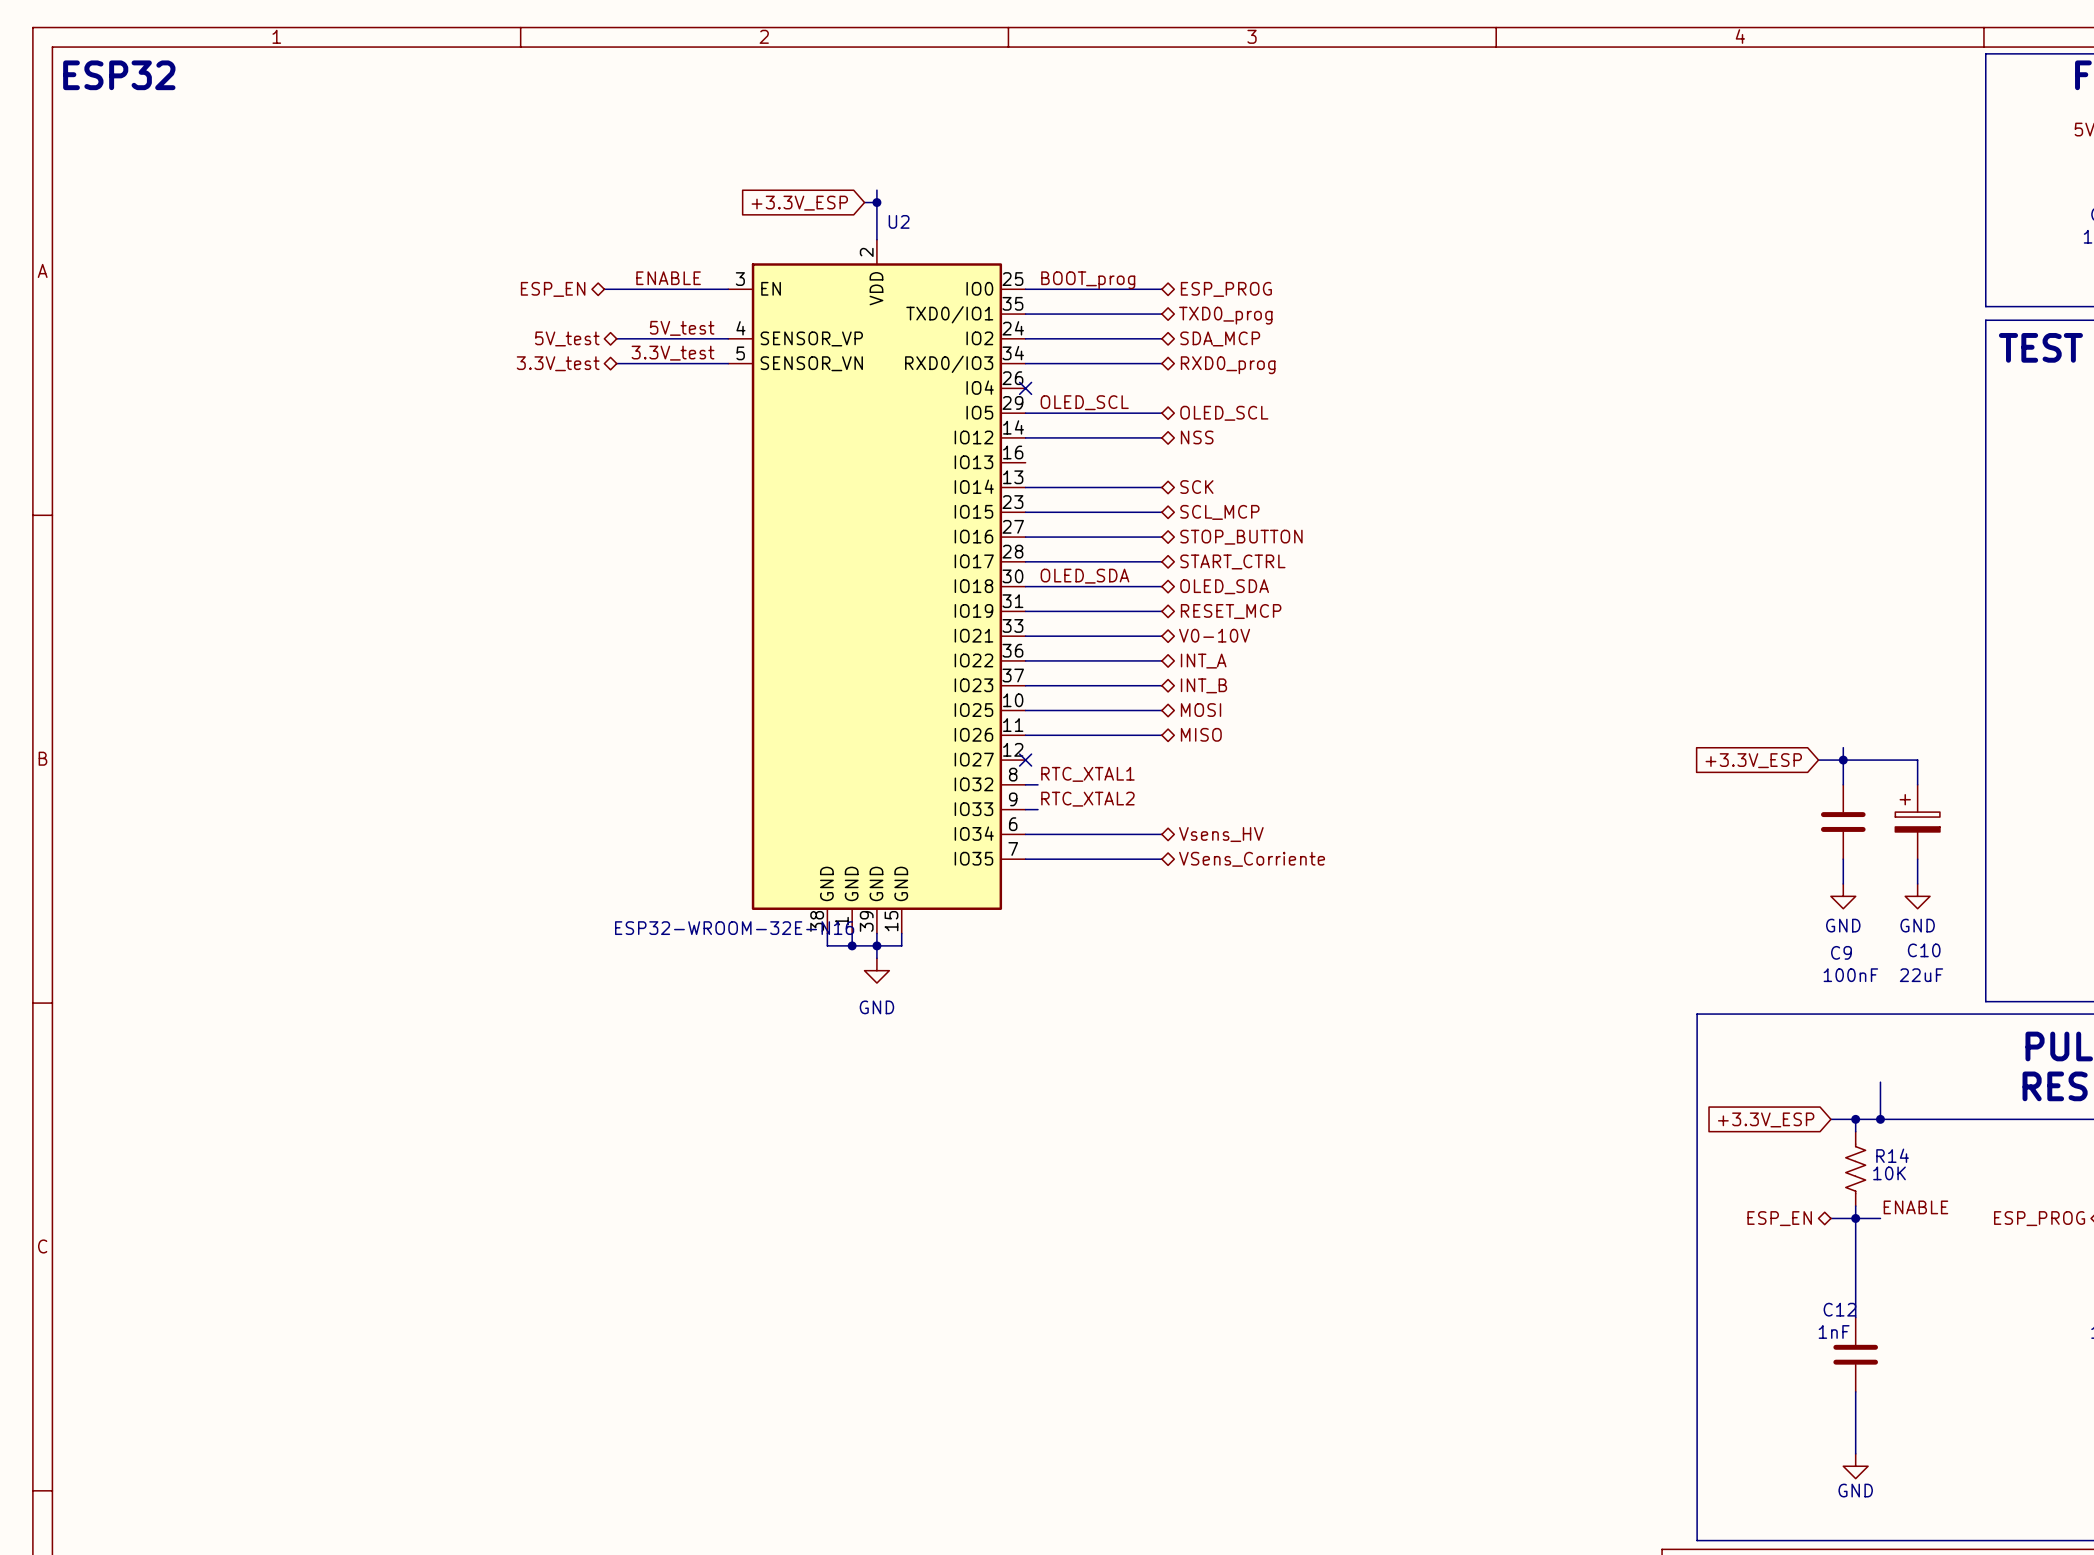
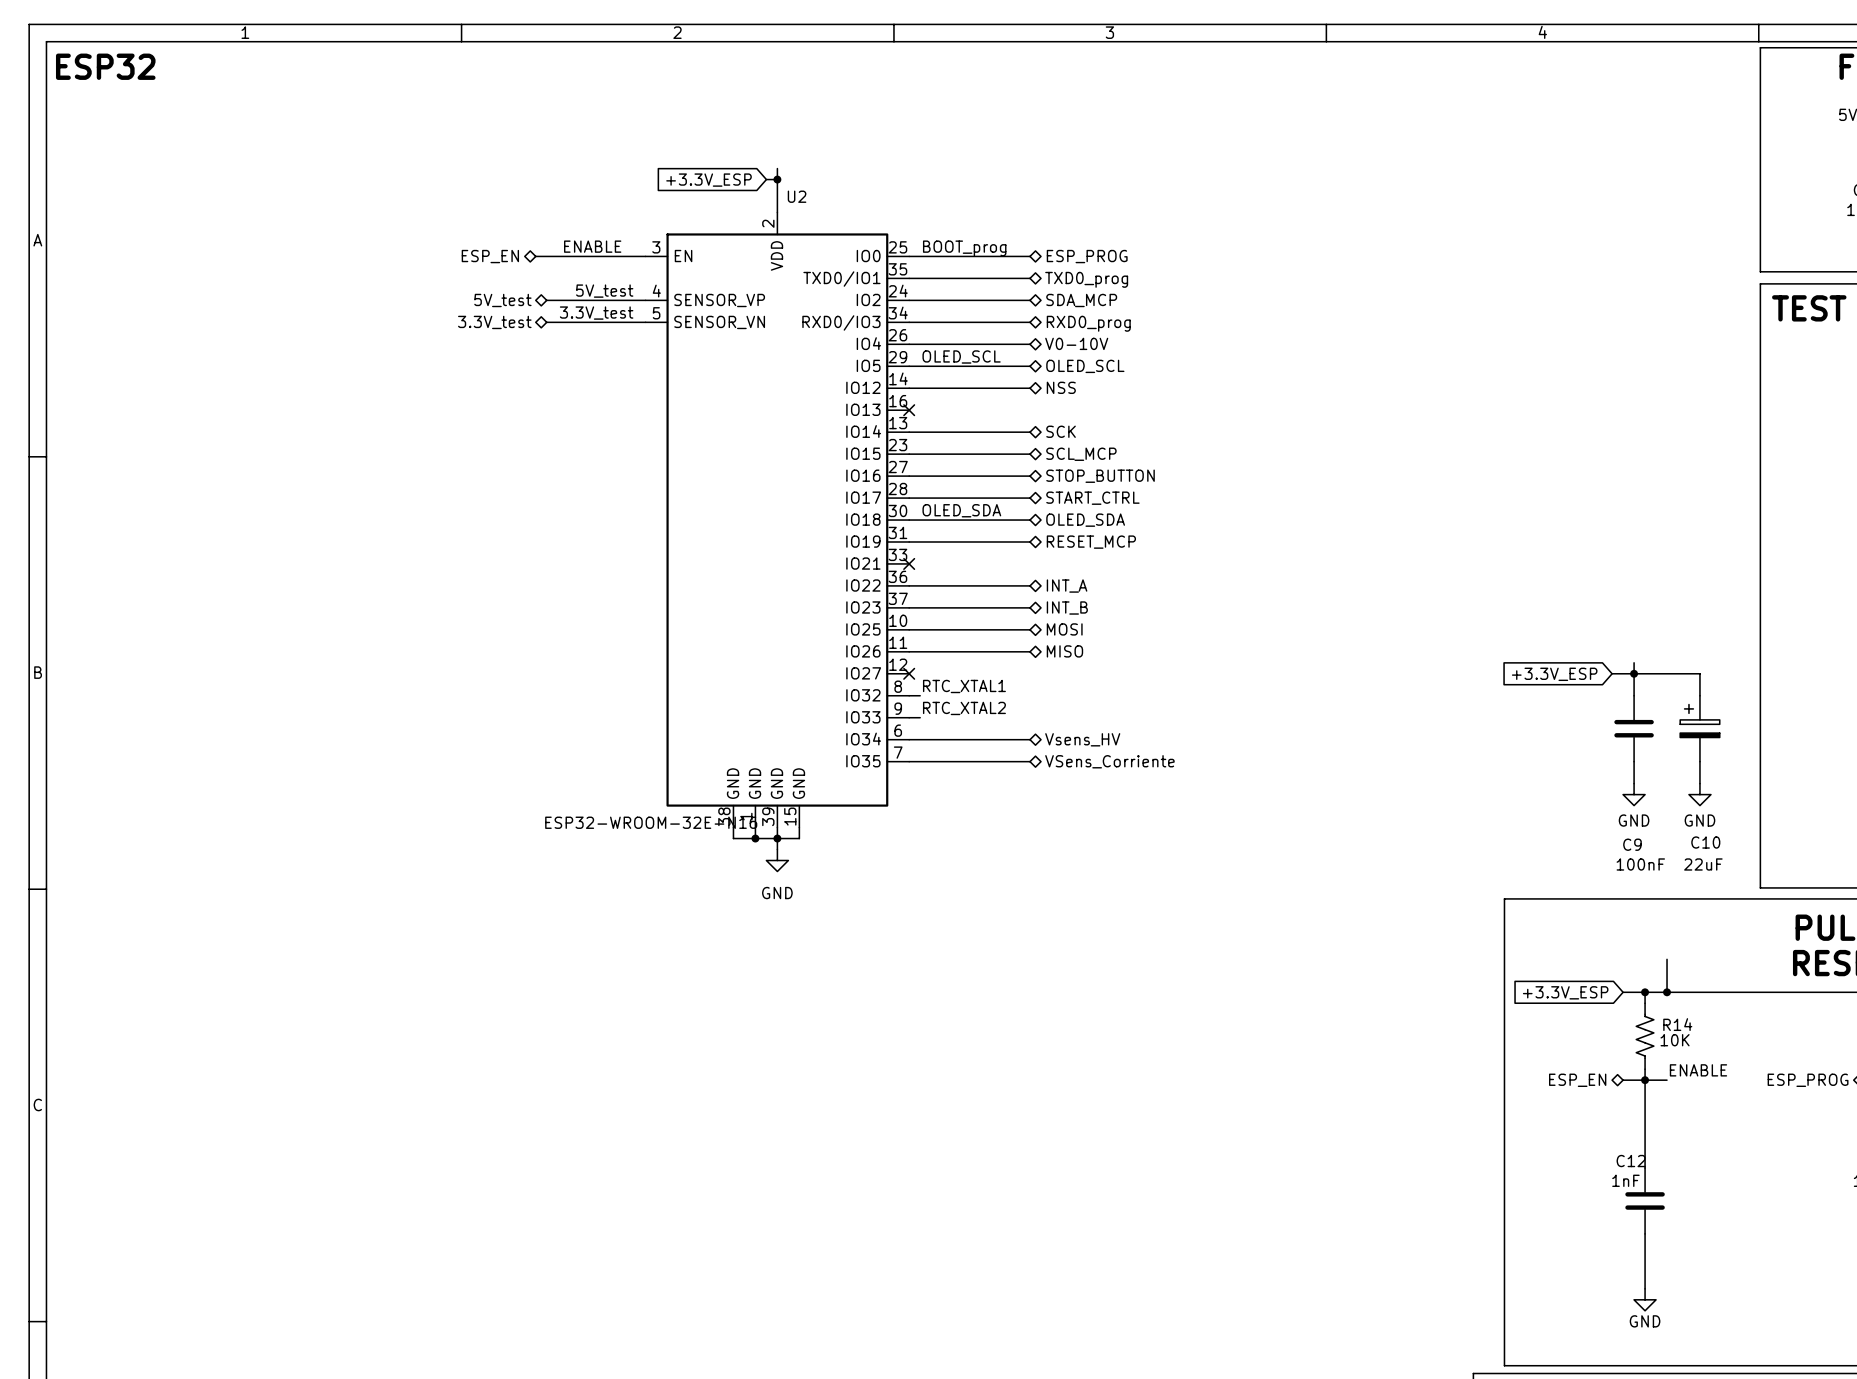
hierarchical label: none -> V0-10V (1076, 343)
wire: none -> (909, 344) (1030, 344)
no-connect mark: (1025, 388) -> none
no-connect mark: none -> (909, 410)
hierarchical label: V0-10V (1214, 635) -> none
wire: (1025, 636) (1161, 636) -> none
no-connect mark: none -> (909, 563)

